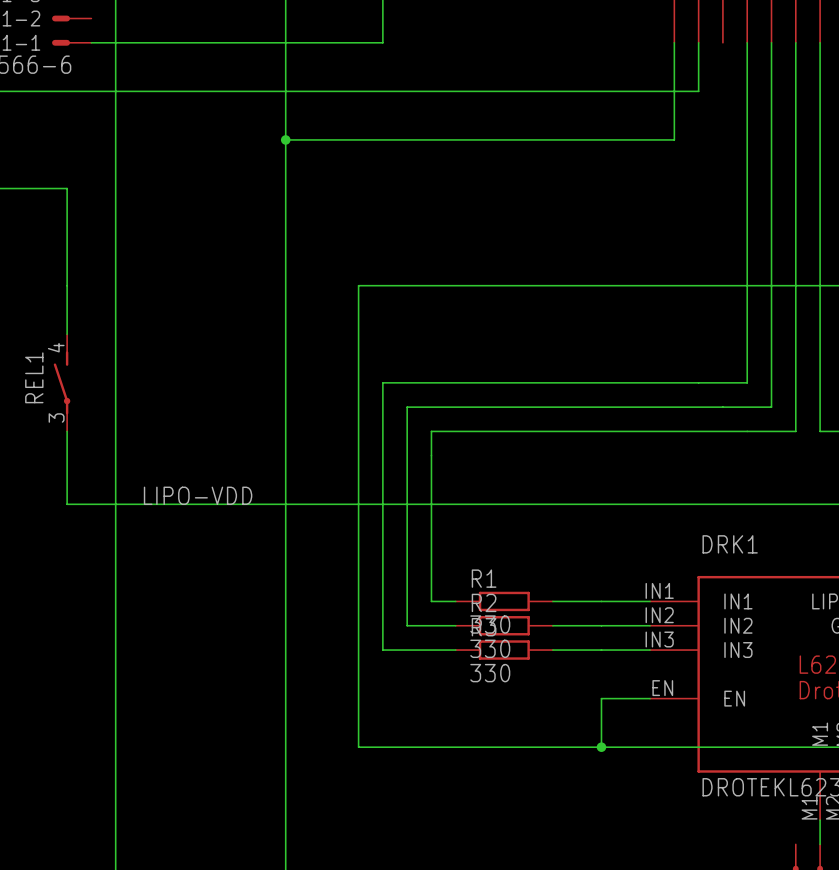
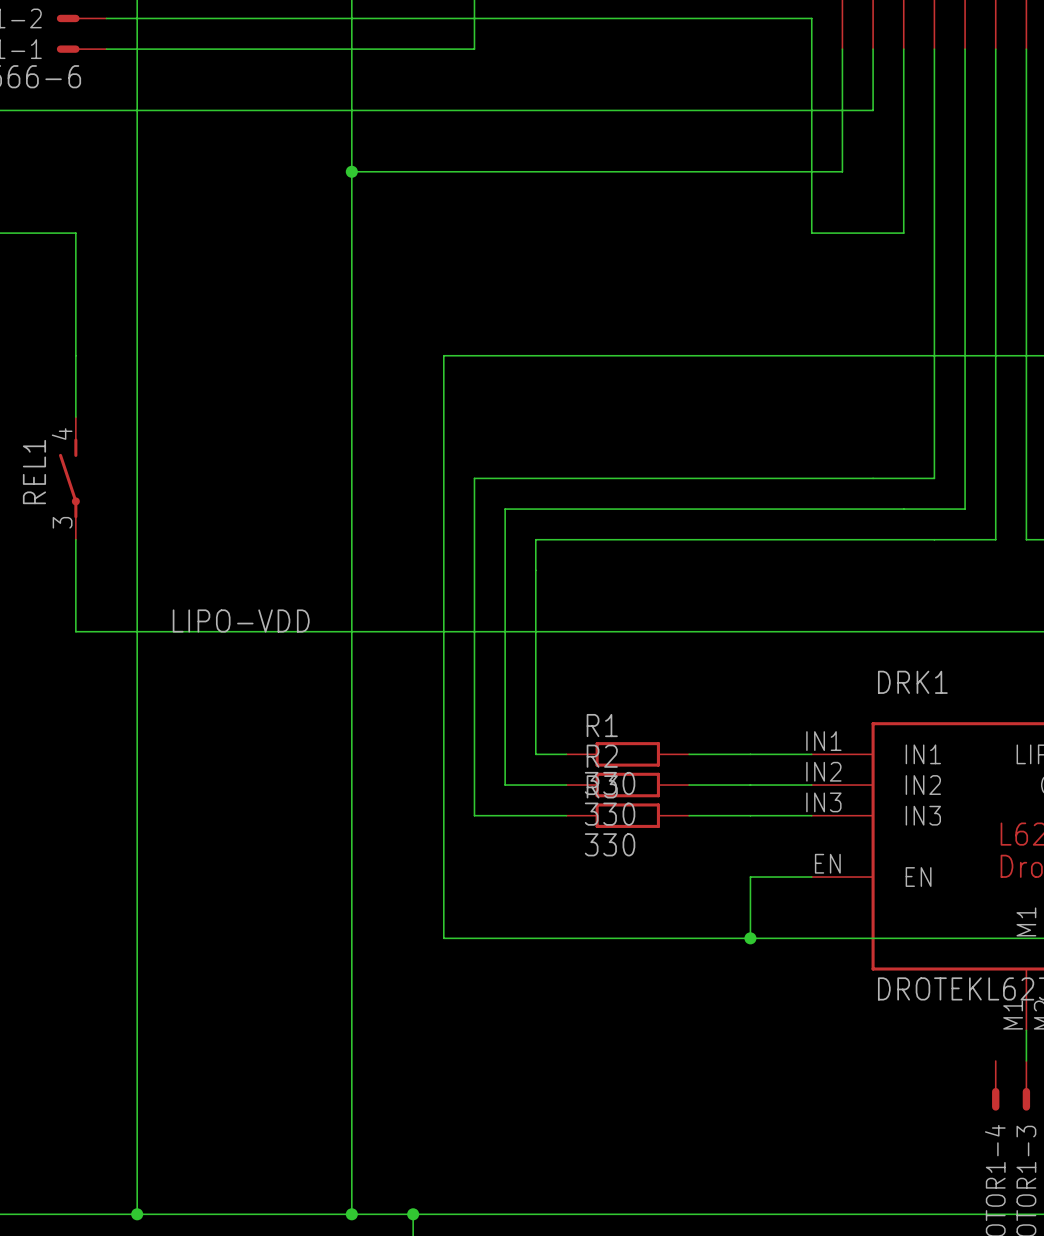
wire: none -> (106, 18) (811, 18) (811, 233) (903, 233) (903, 49)

